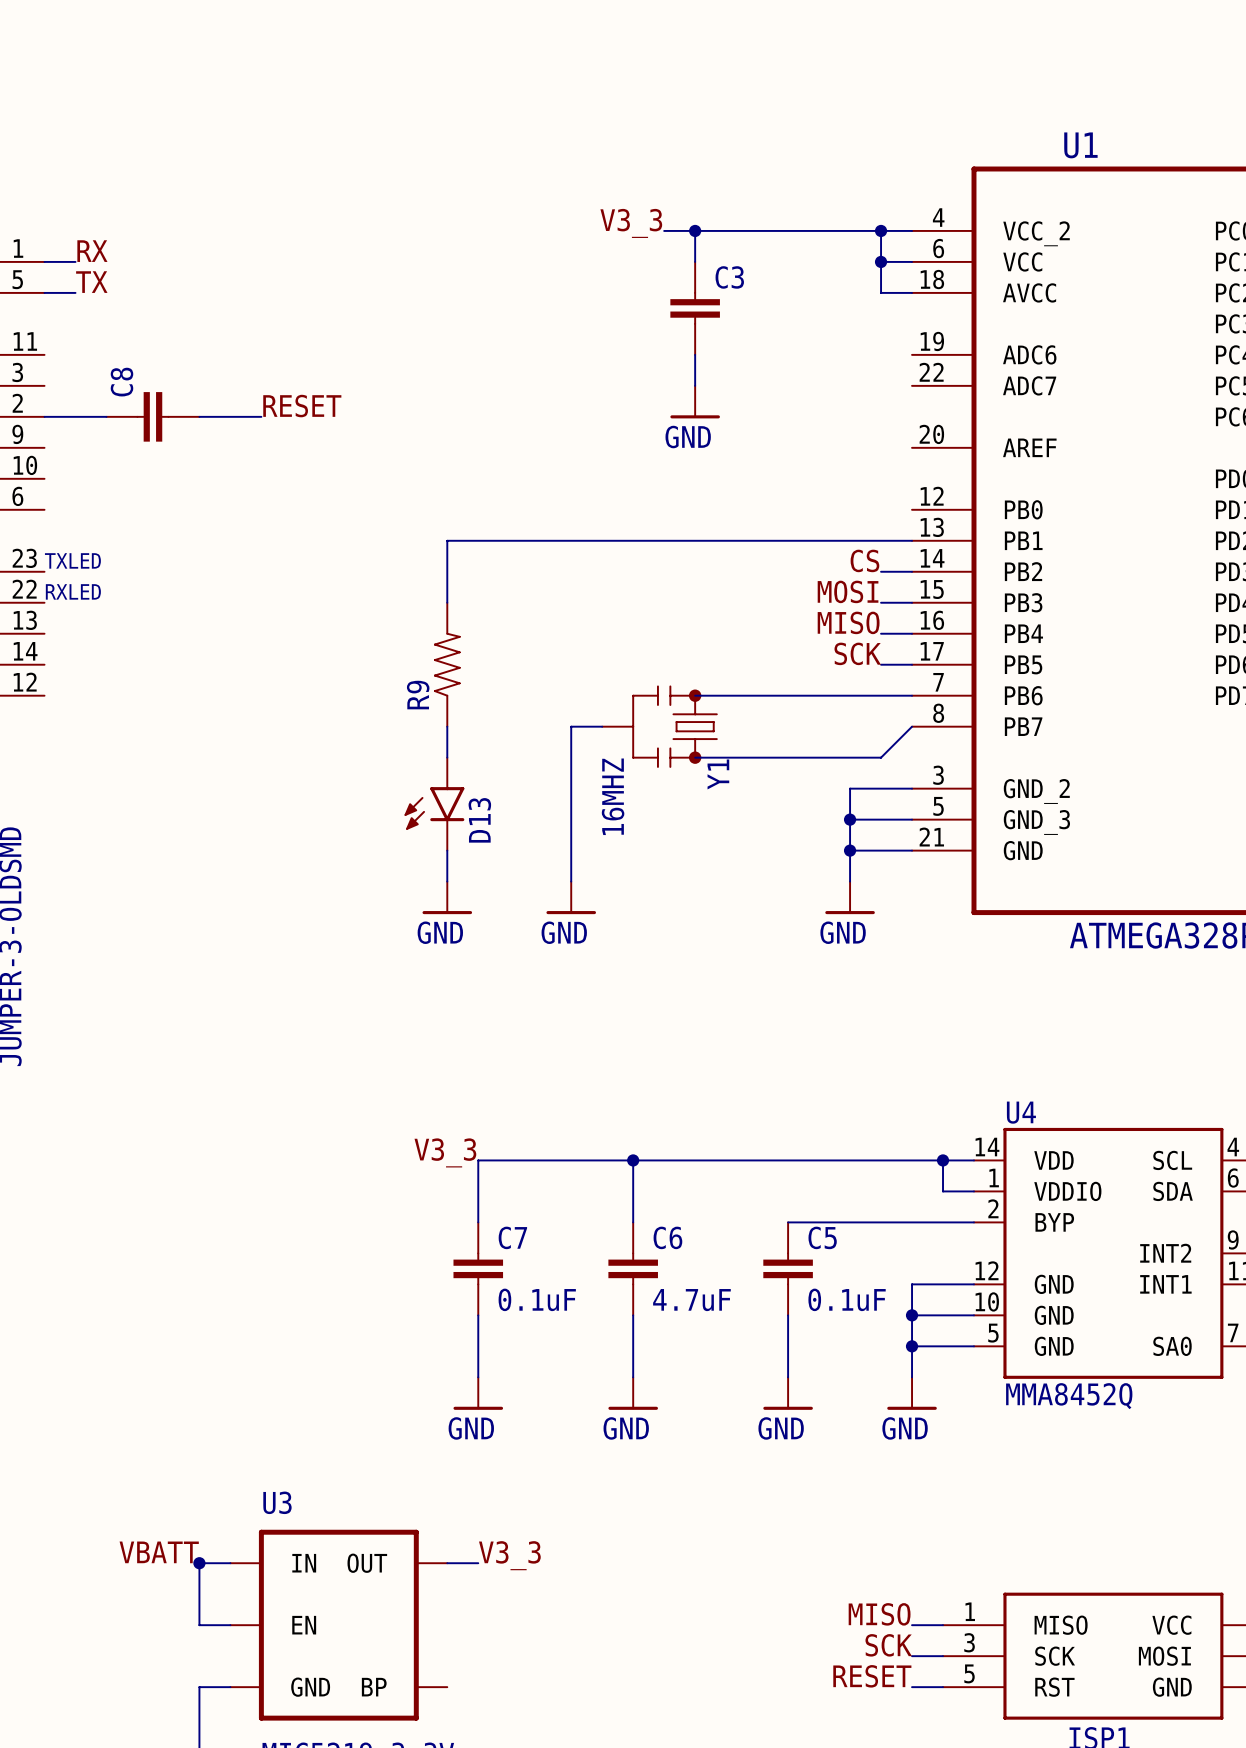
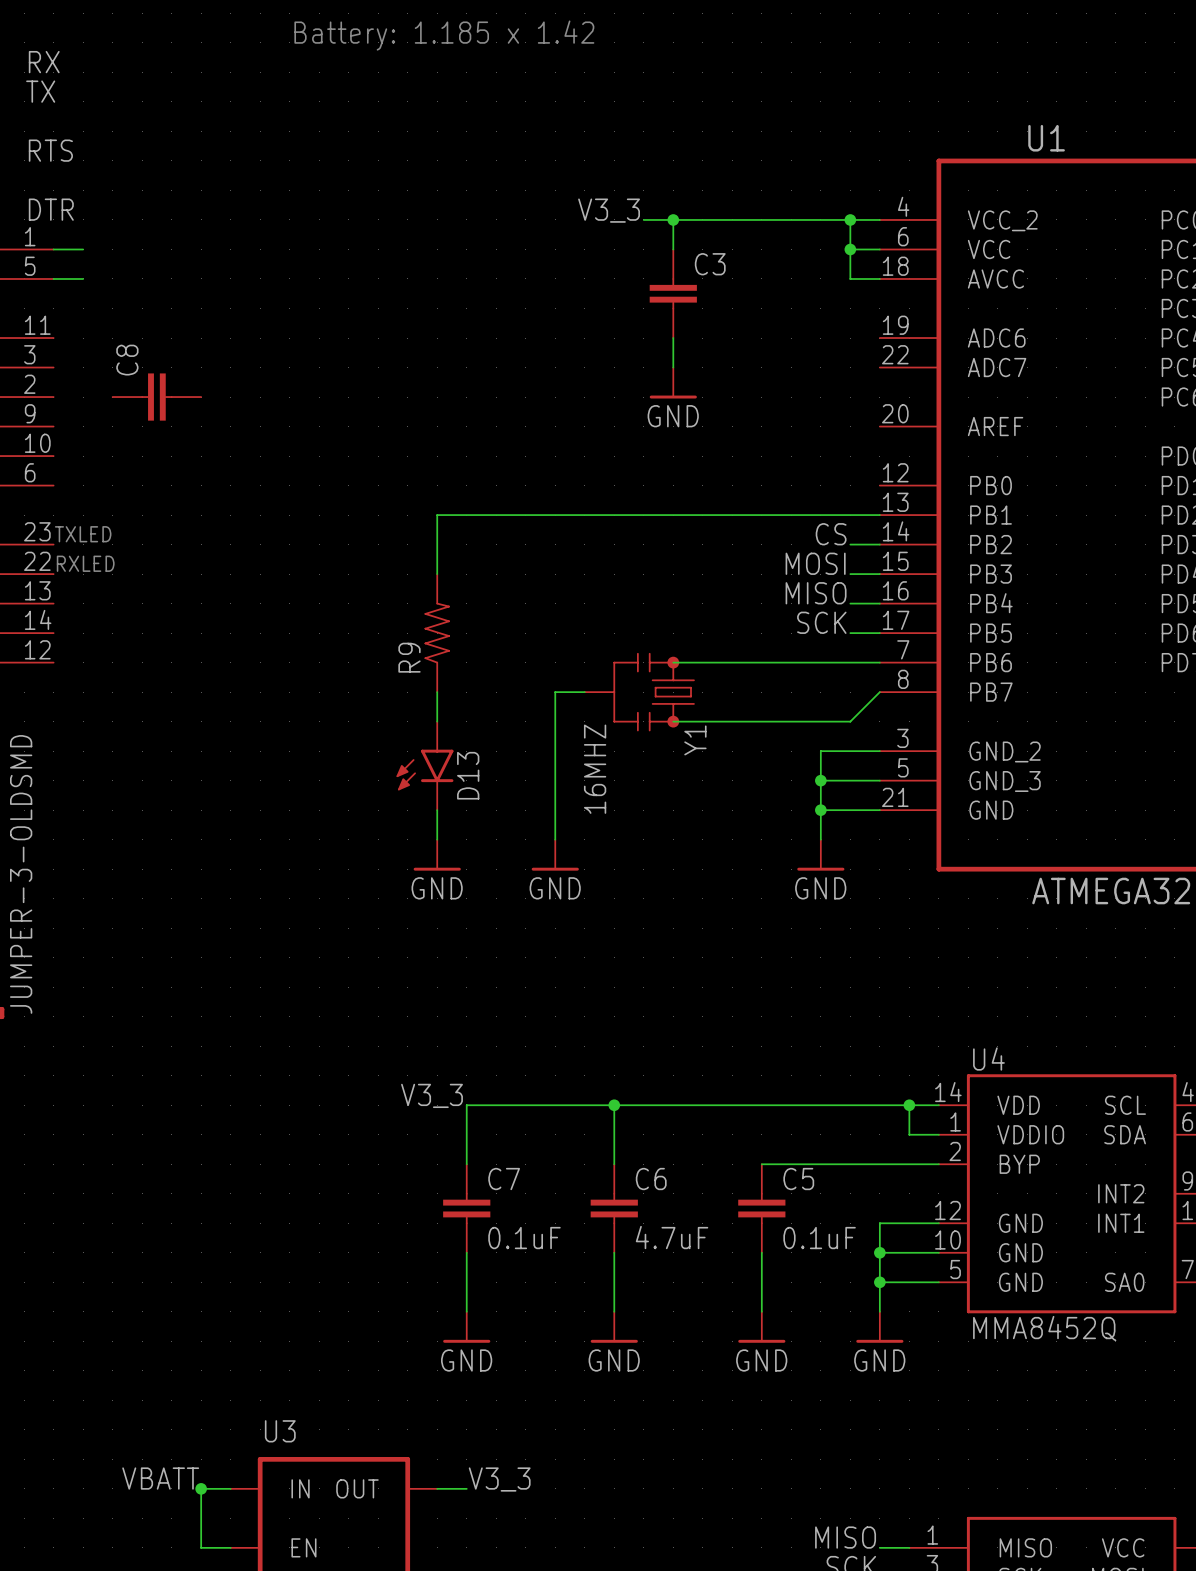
text: none -> Battery: 1.185 x 1.42 (444, 35)
label: none -> RTS (50, 150)
label: none -> DTR (51, 209)
label position: RX (92, 251) -> RX (44, 62)
label position: TX (91, 282) -> TX (40, 91)
label: RESET (302, 406) -> none
wire: (44, 416) (106, 416) -> none
wire: (199, 416) (261, 416) -> none

